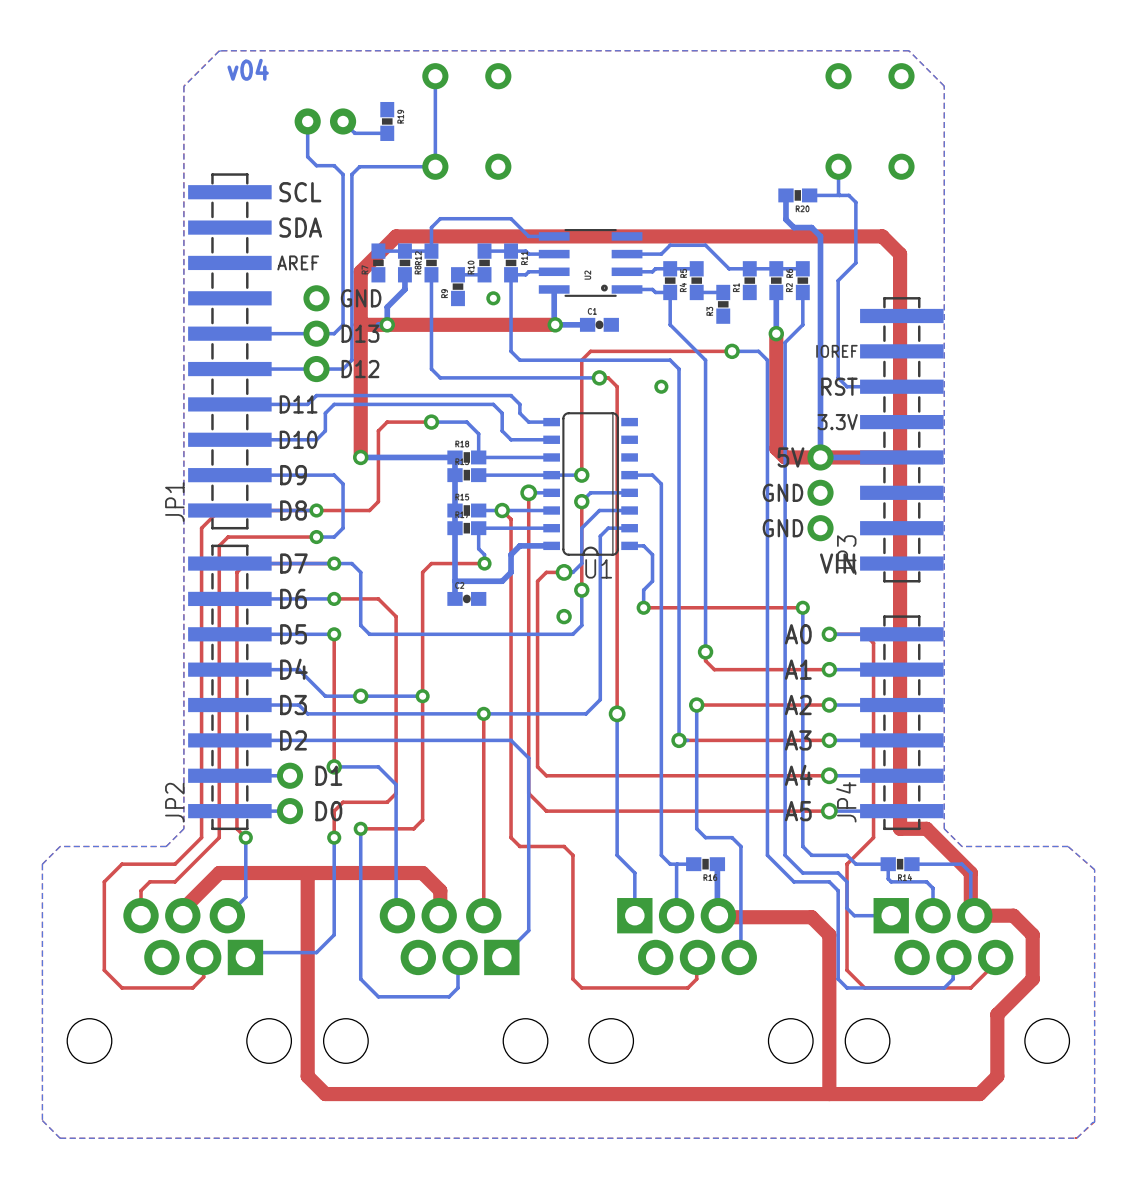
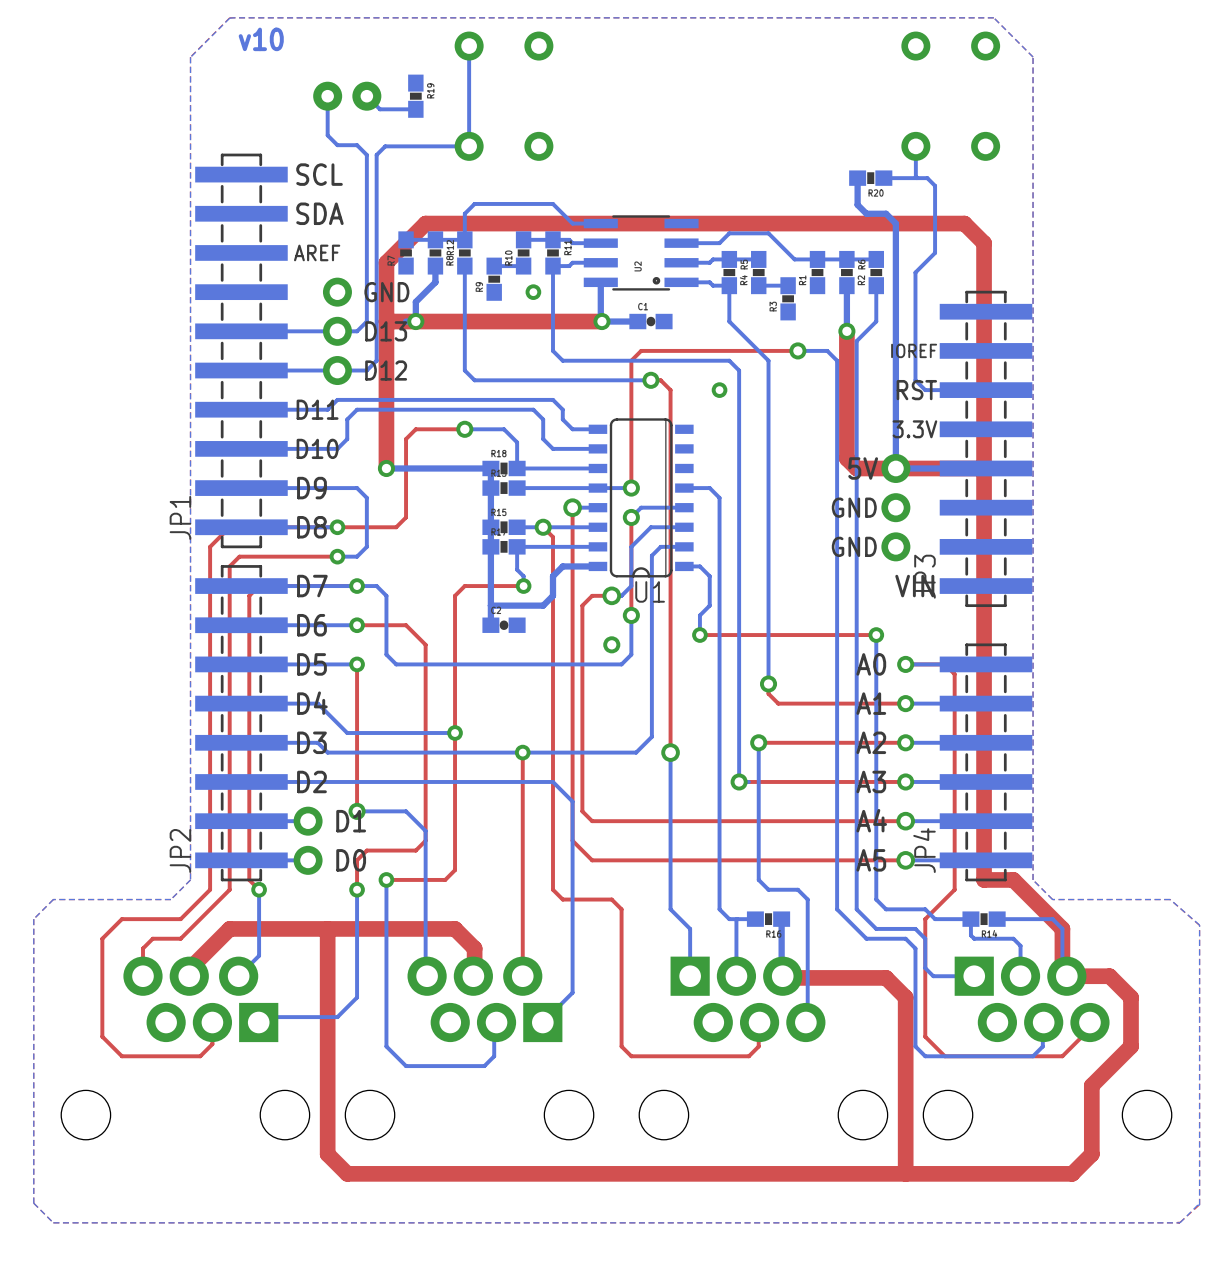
text: v04 (248, 69) -> v10 (261, 39)
via: (360, 696) -> none

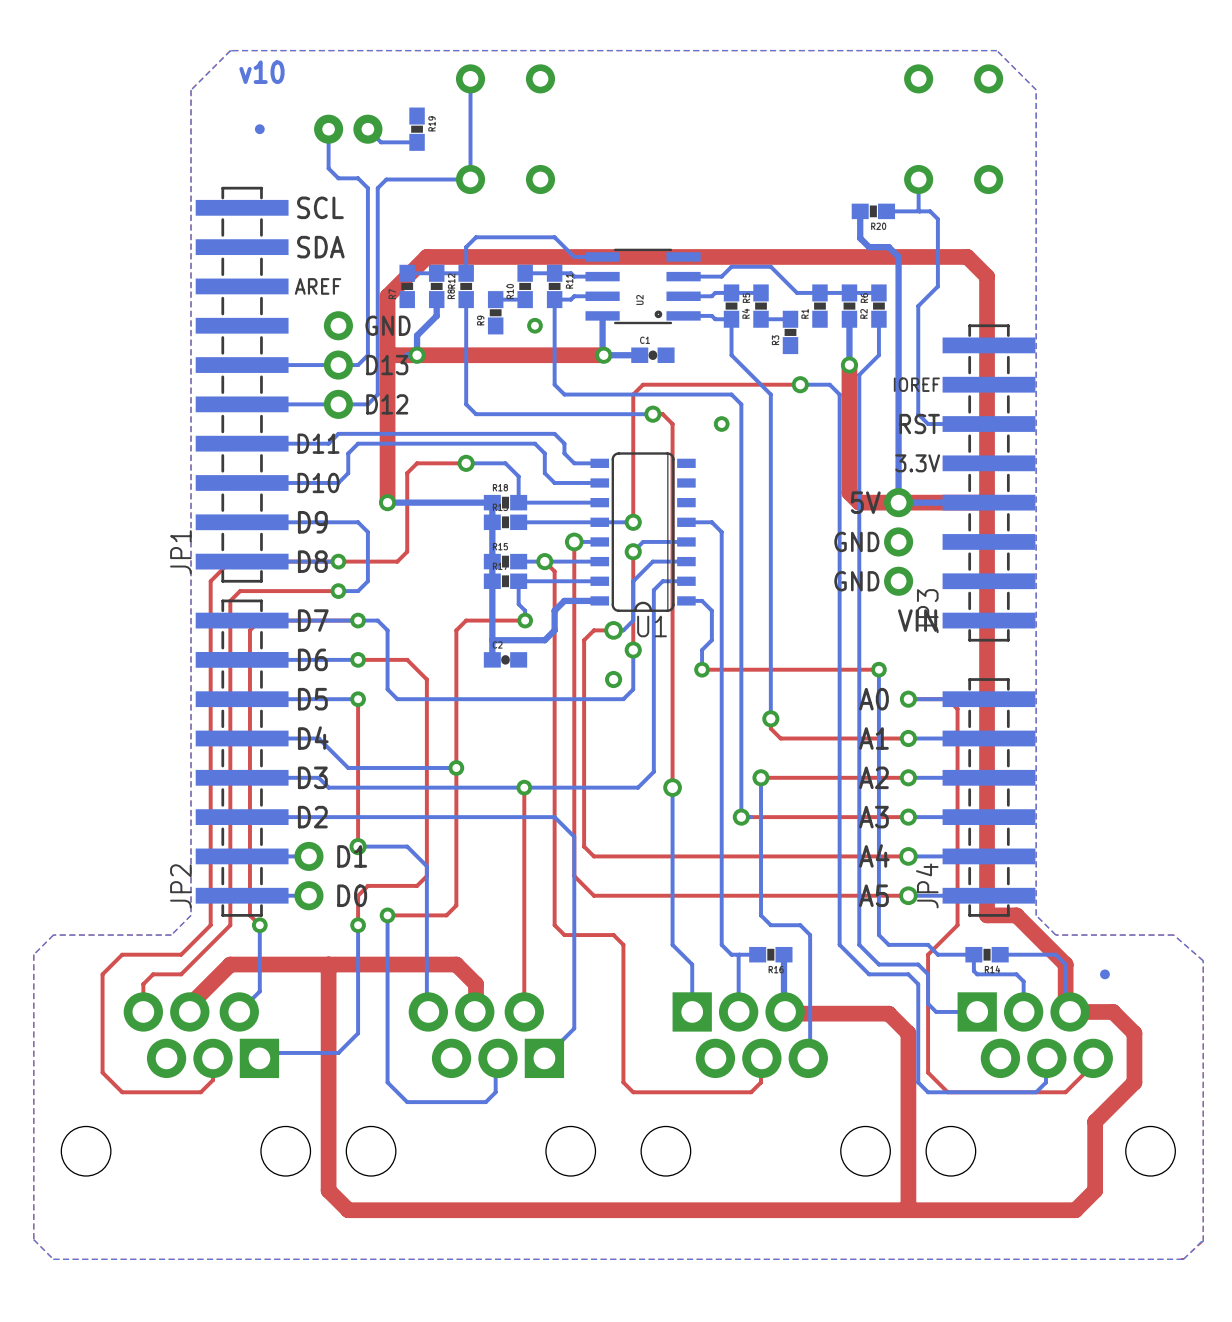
part: none -> (259, 129)
part: none -> (1104, 974)

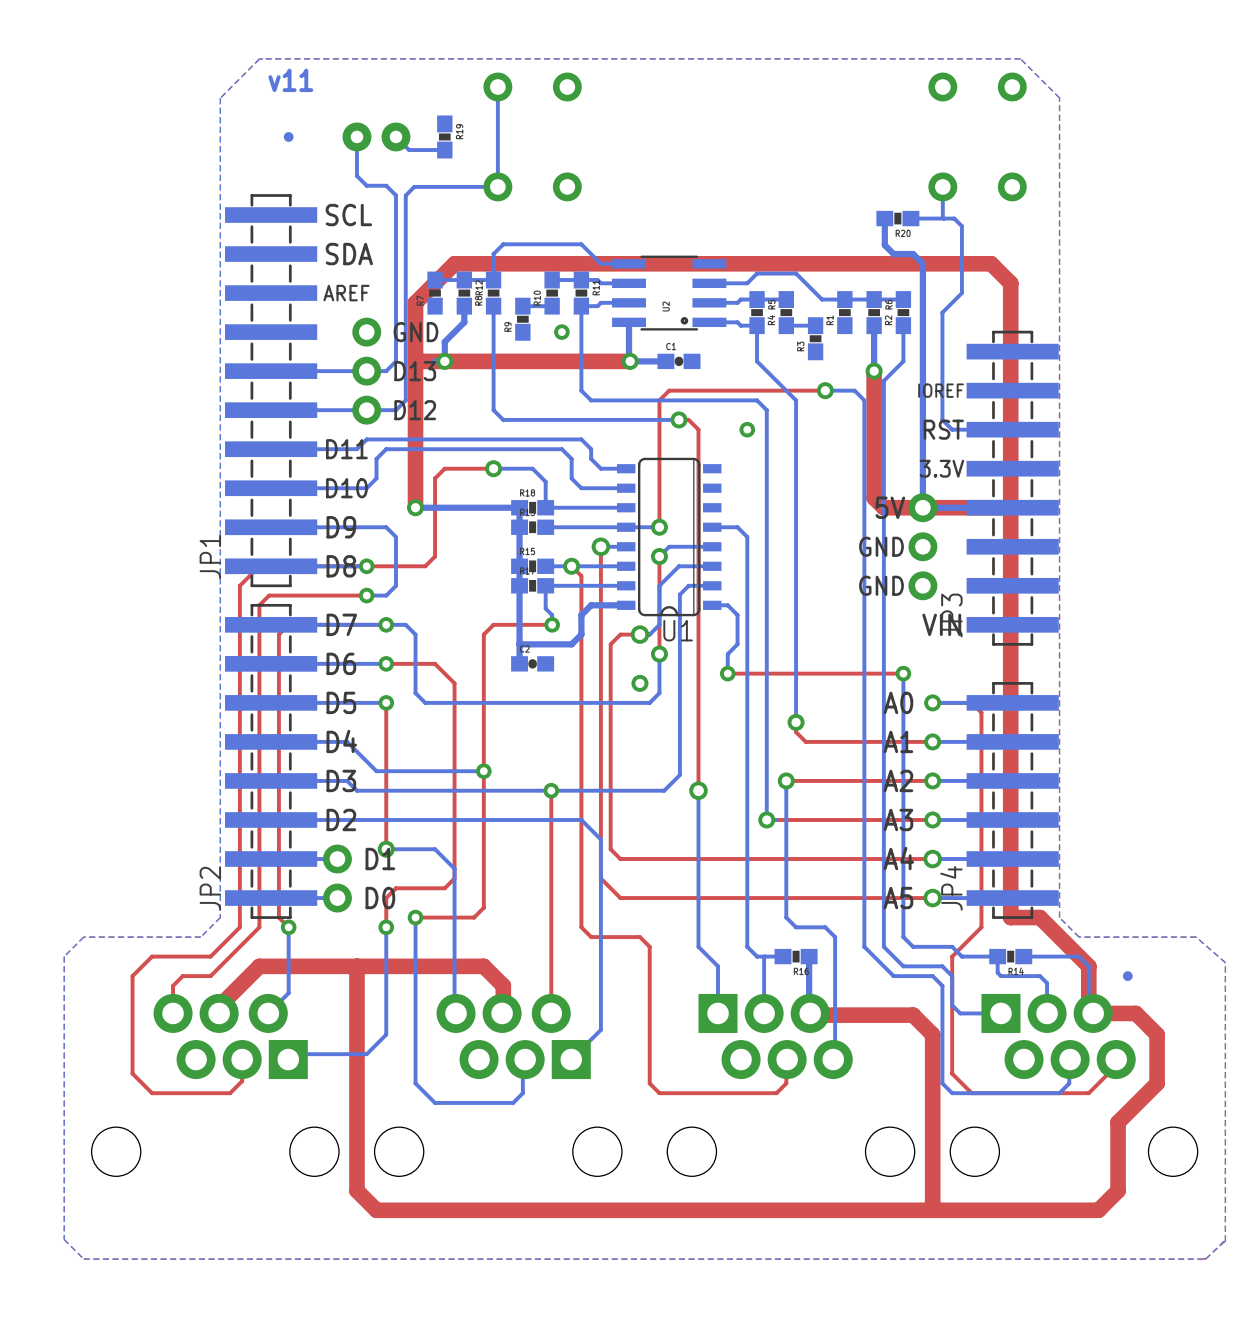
text: v10 (261, 72) -> v11 (290, 80)

